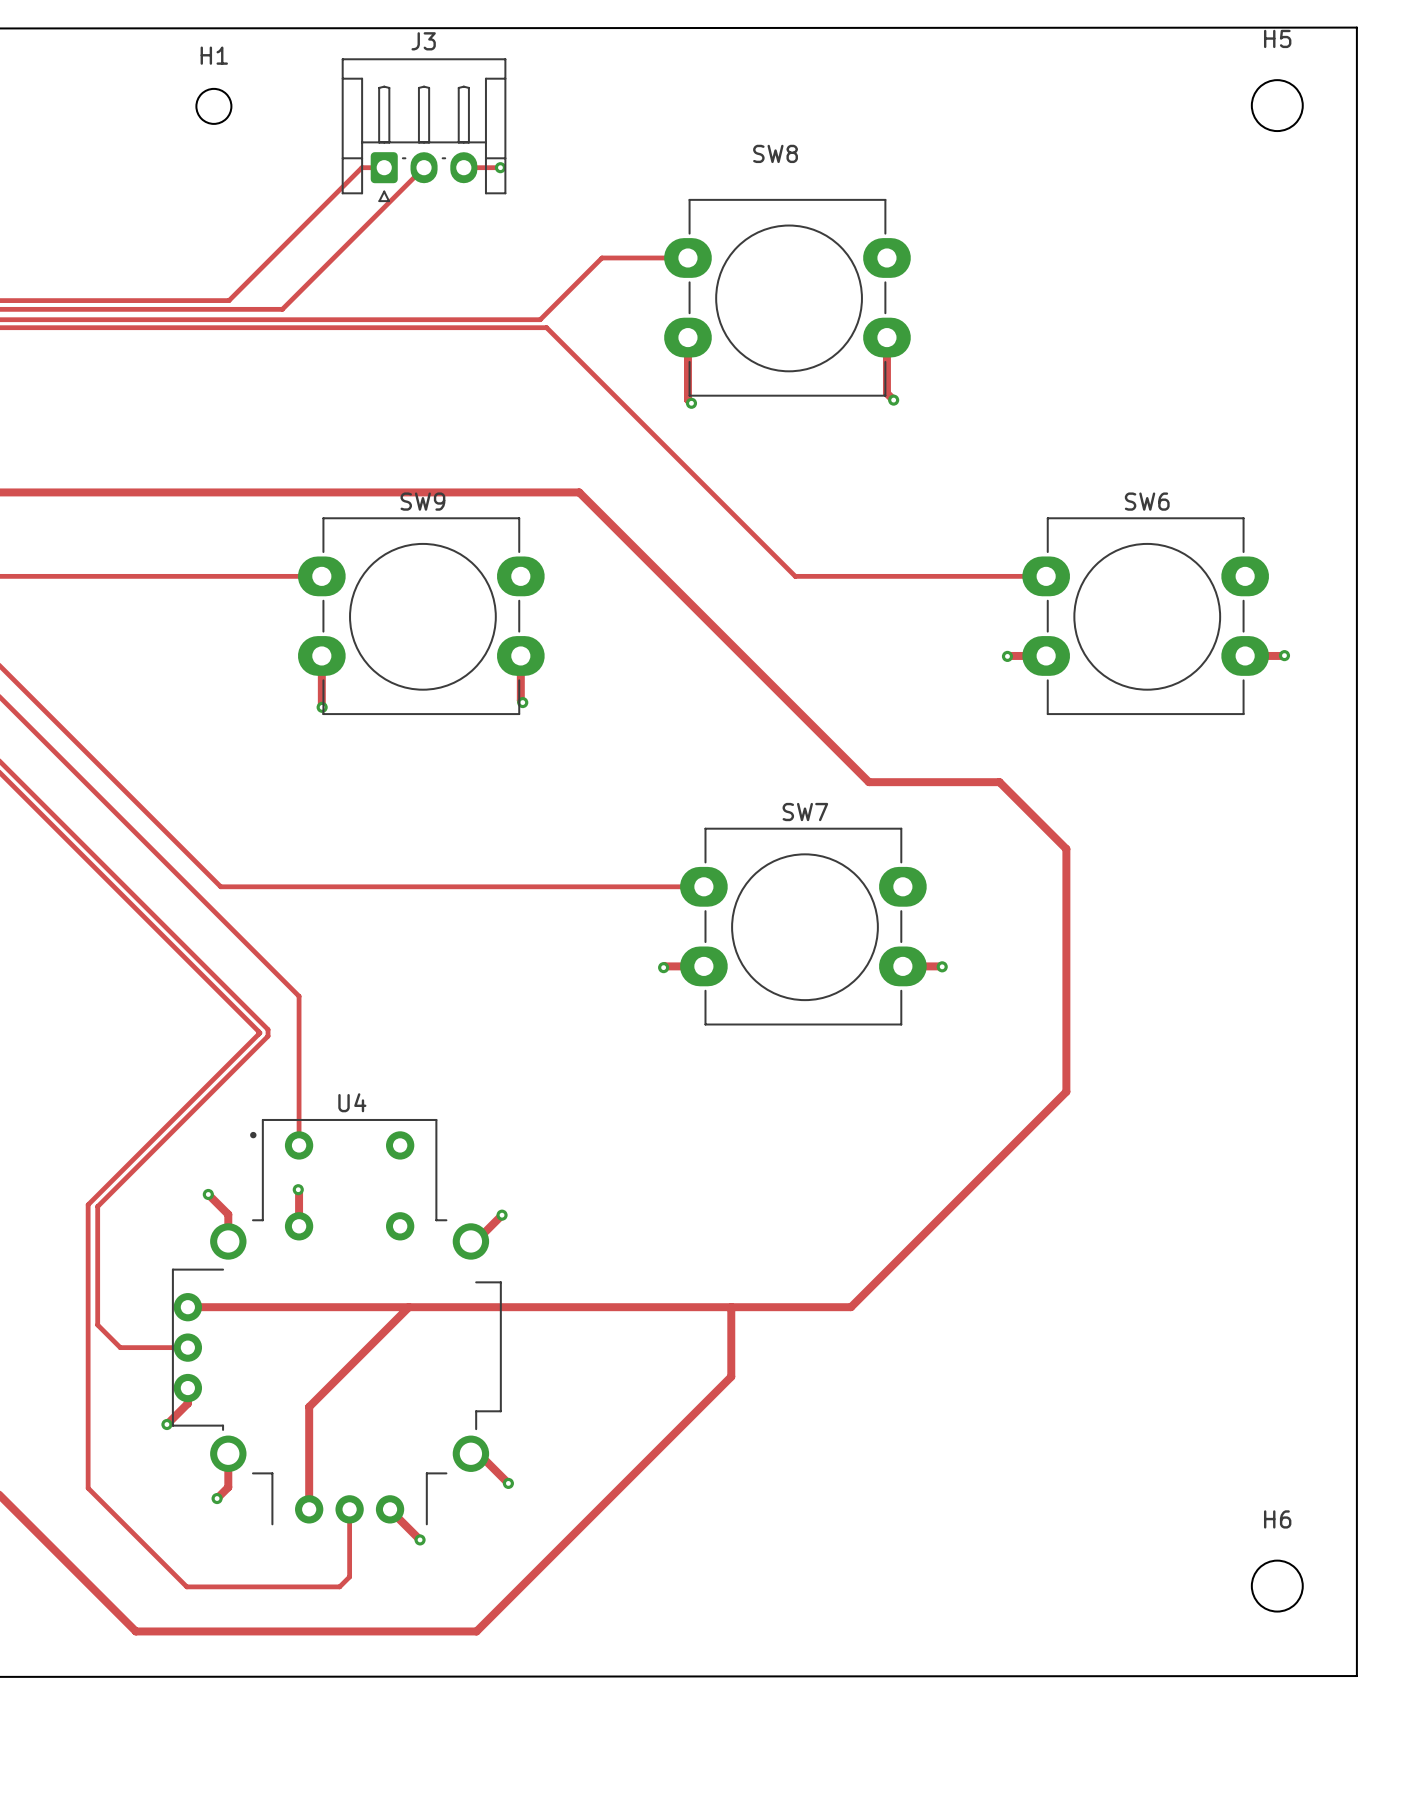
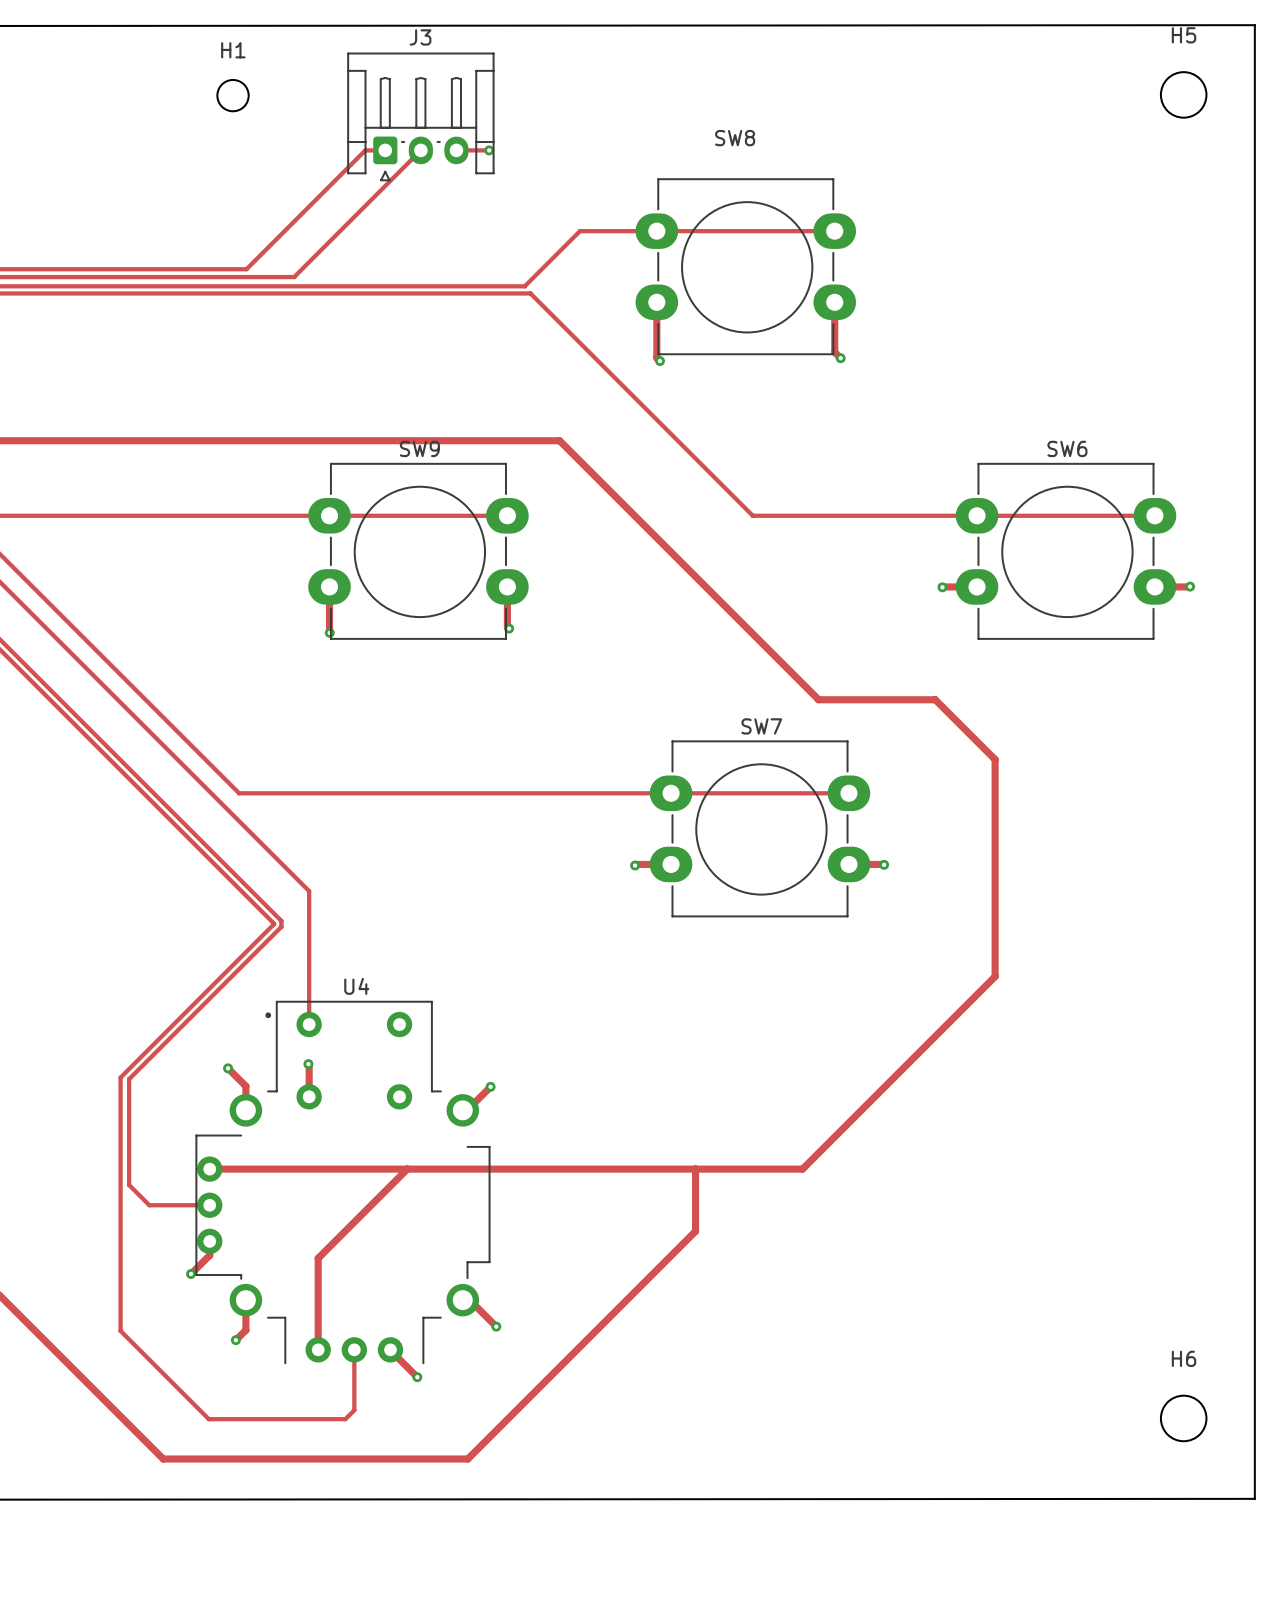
top track: none -> (656, 231) (834, 231)
top track: none -> (329, 515) (507, 515)
top track: none -> (977, 515) (1154, 515)
top track: none -> (671, 793) (848, 793)

